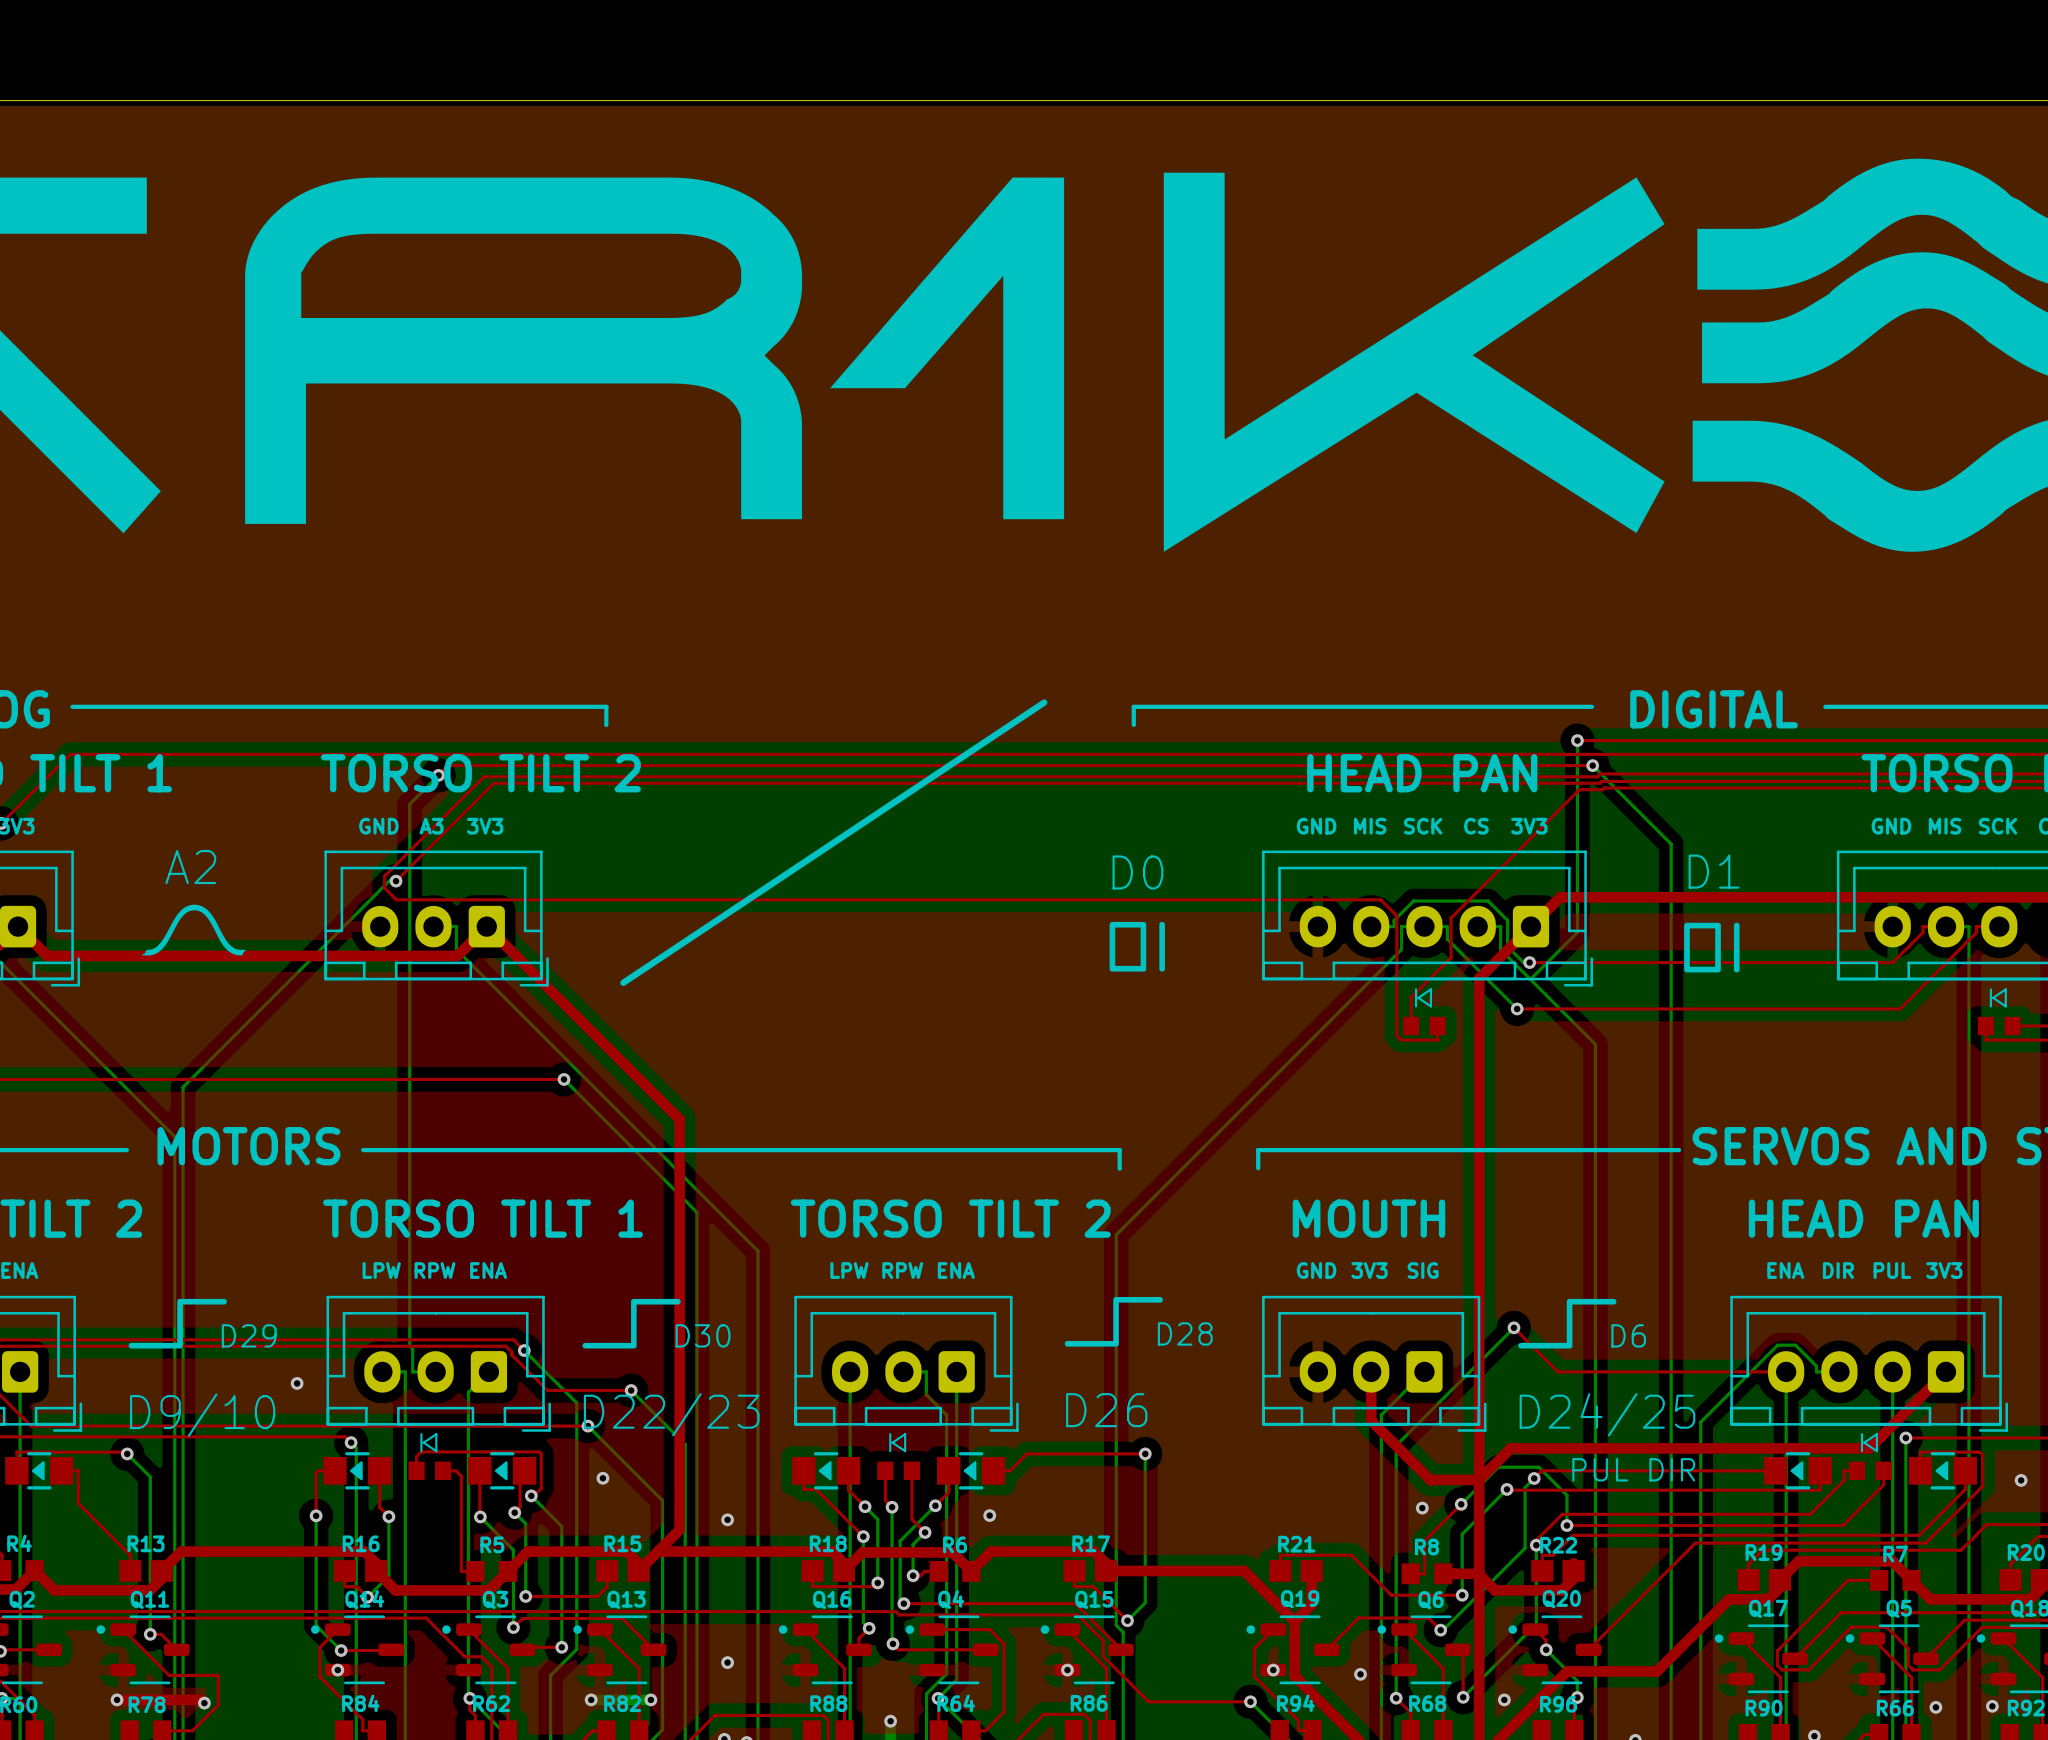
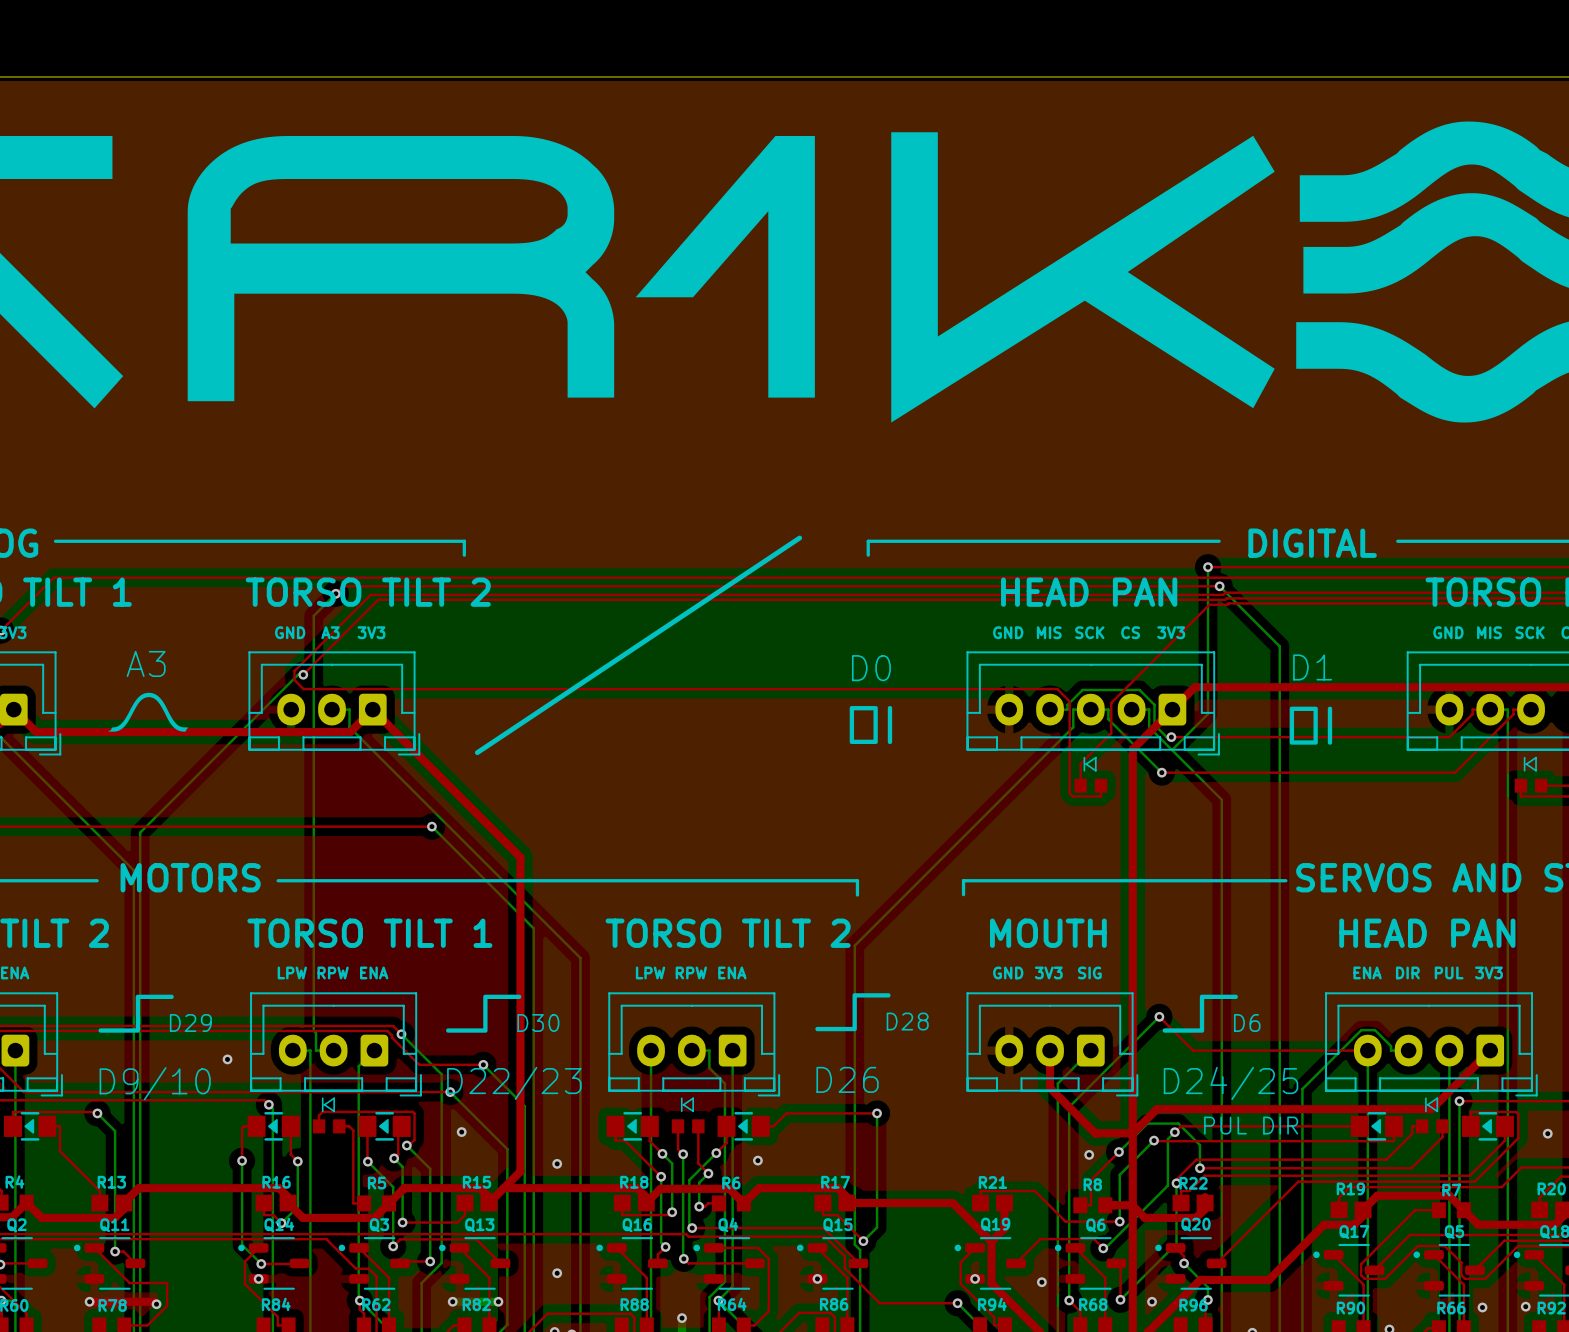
text: A2 (190, 867) -> A3 (146, 663)

